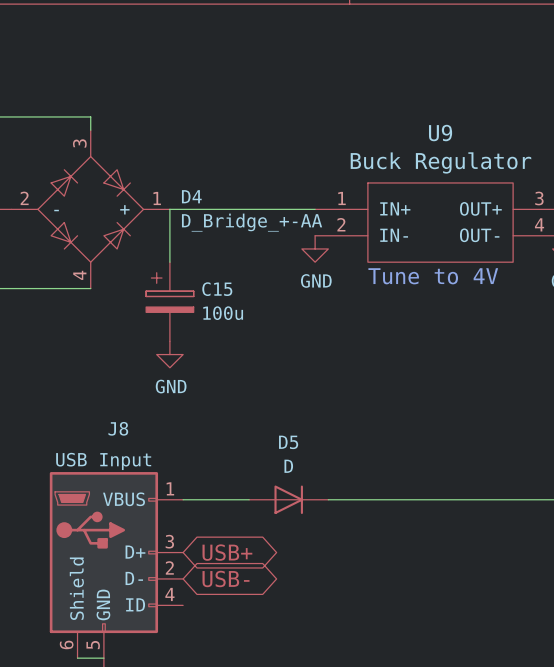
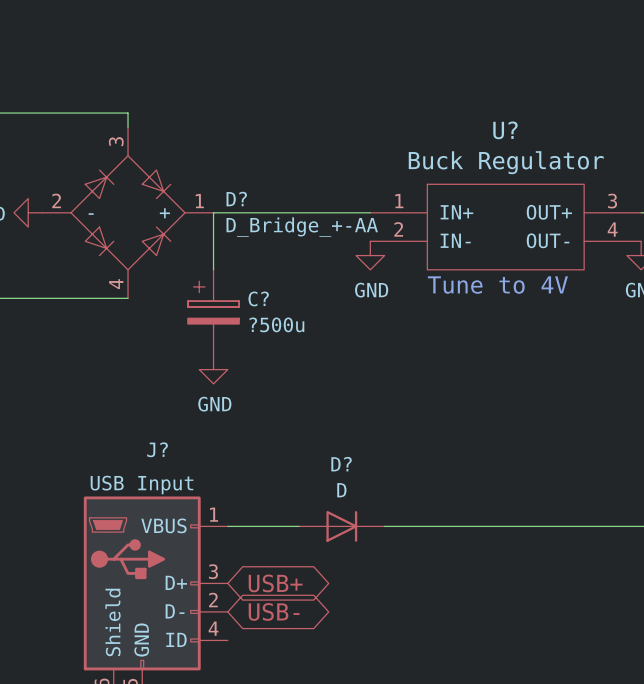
U9 name: U9 (440, 133) -> U? (505, 130)
D4 name: D4 (191, 196) -> D? (236, 199)
C15 name: C15 (217, 289) -> C? (258, 298)
C15 value: 100u (223, 313) -> ?500u (276, 324)
J8 name: J8 (118, 428) -> J? (157, 449)
D5 name: D5 (288, 442) -> D? (341, 464)

